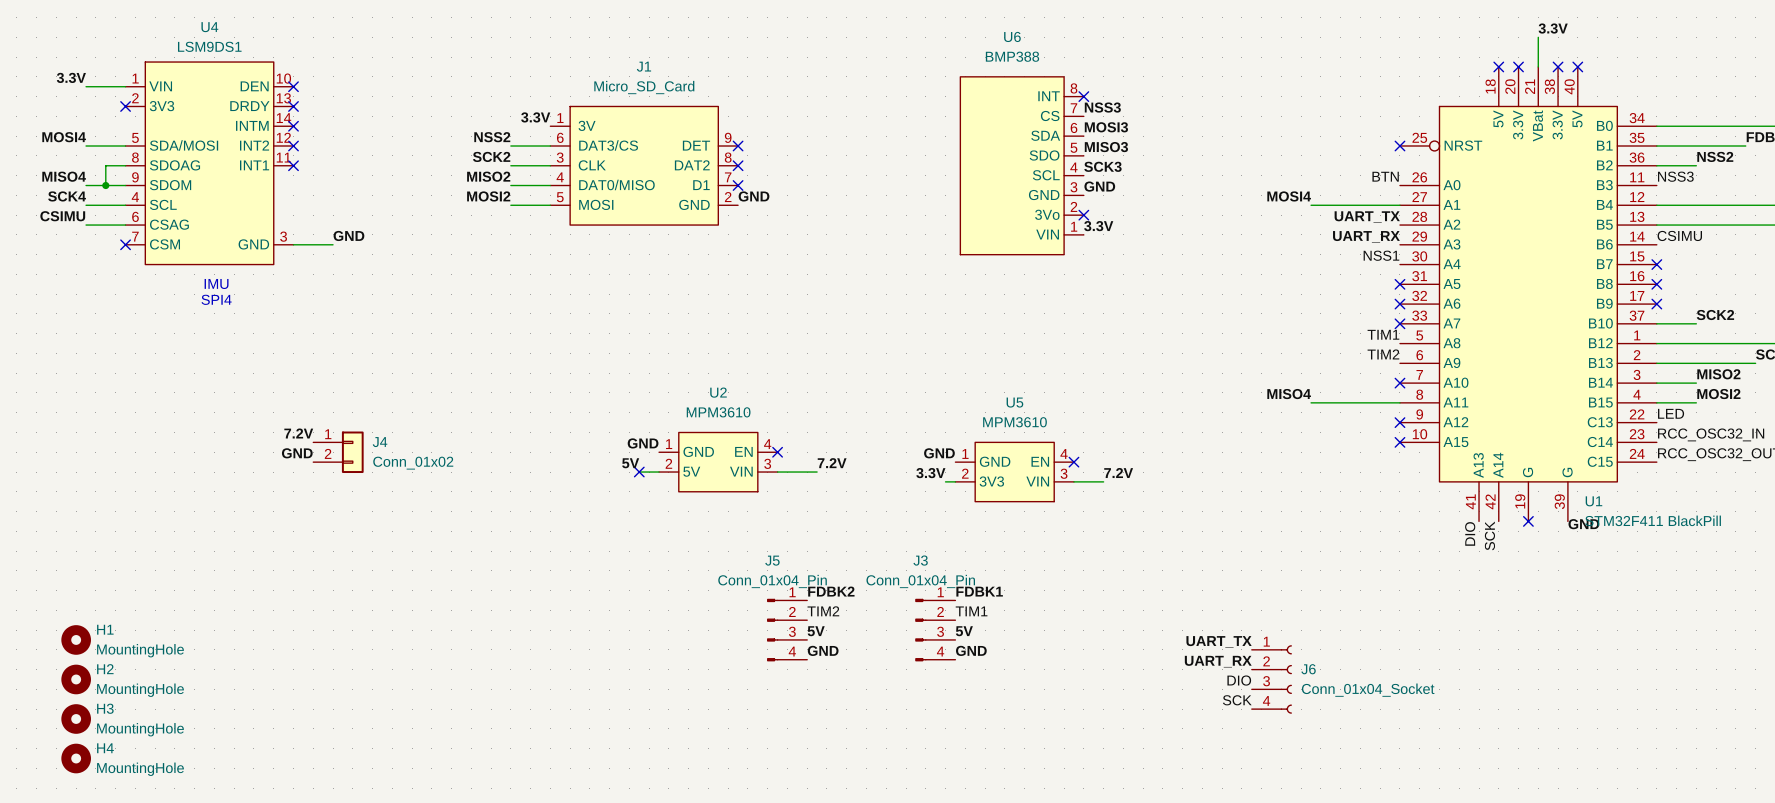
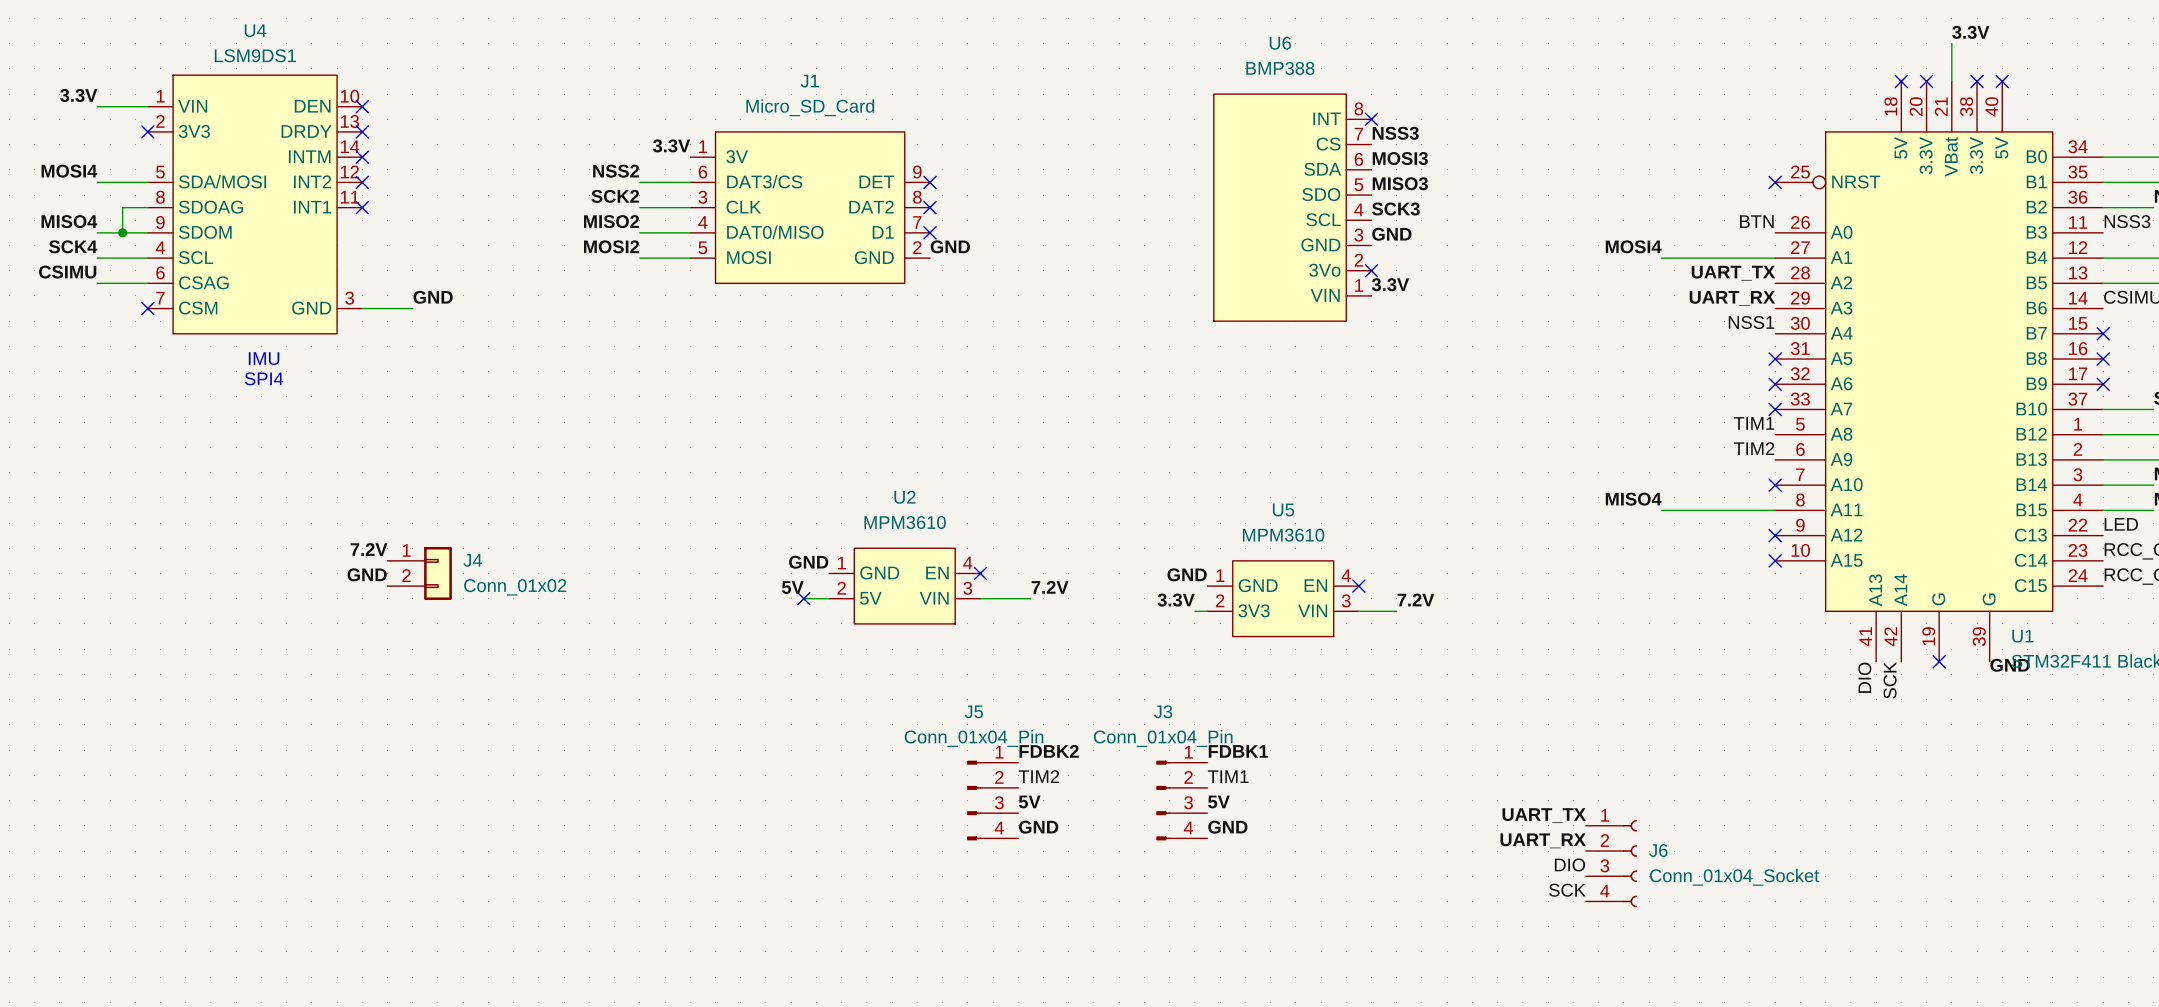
H1: MountingHole (76, 639) -> none
H2: MountingHole (76, 679) -> none
H3: MountingHole (76, 718) -> none
H4: MountingHole (76, 758) -> none

